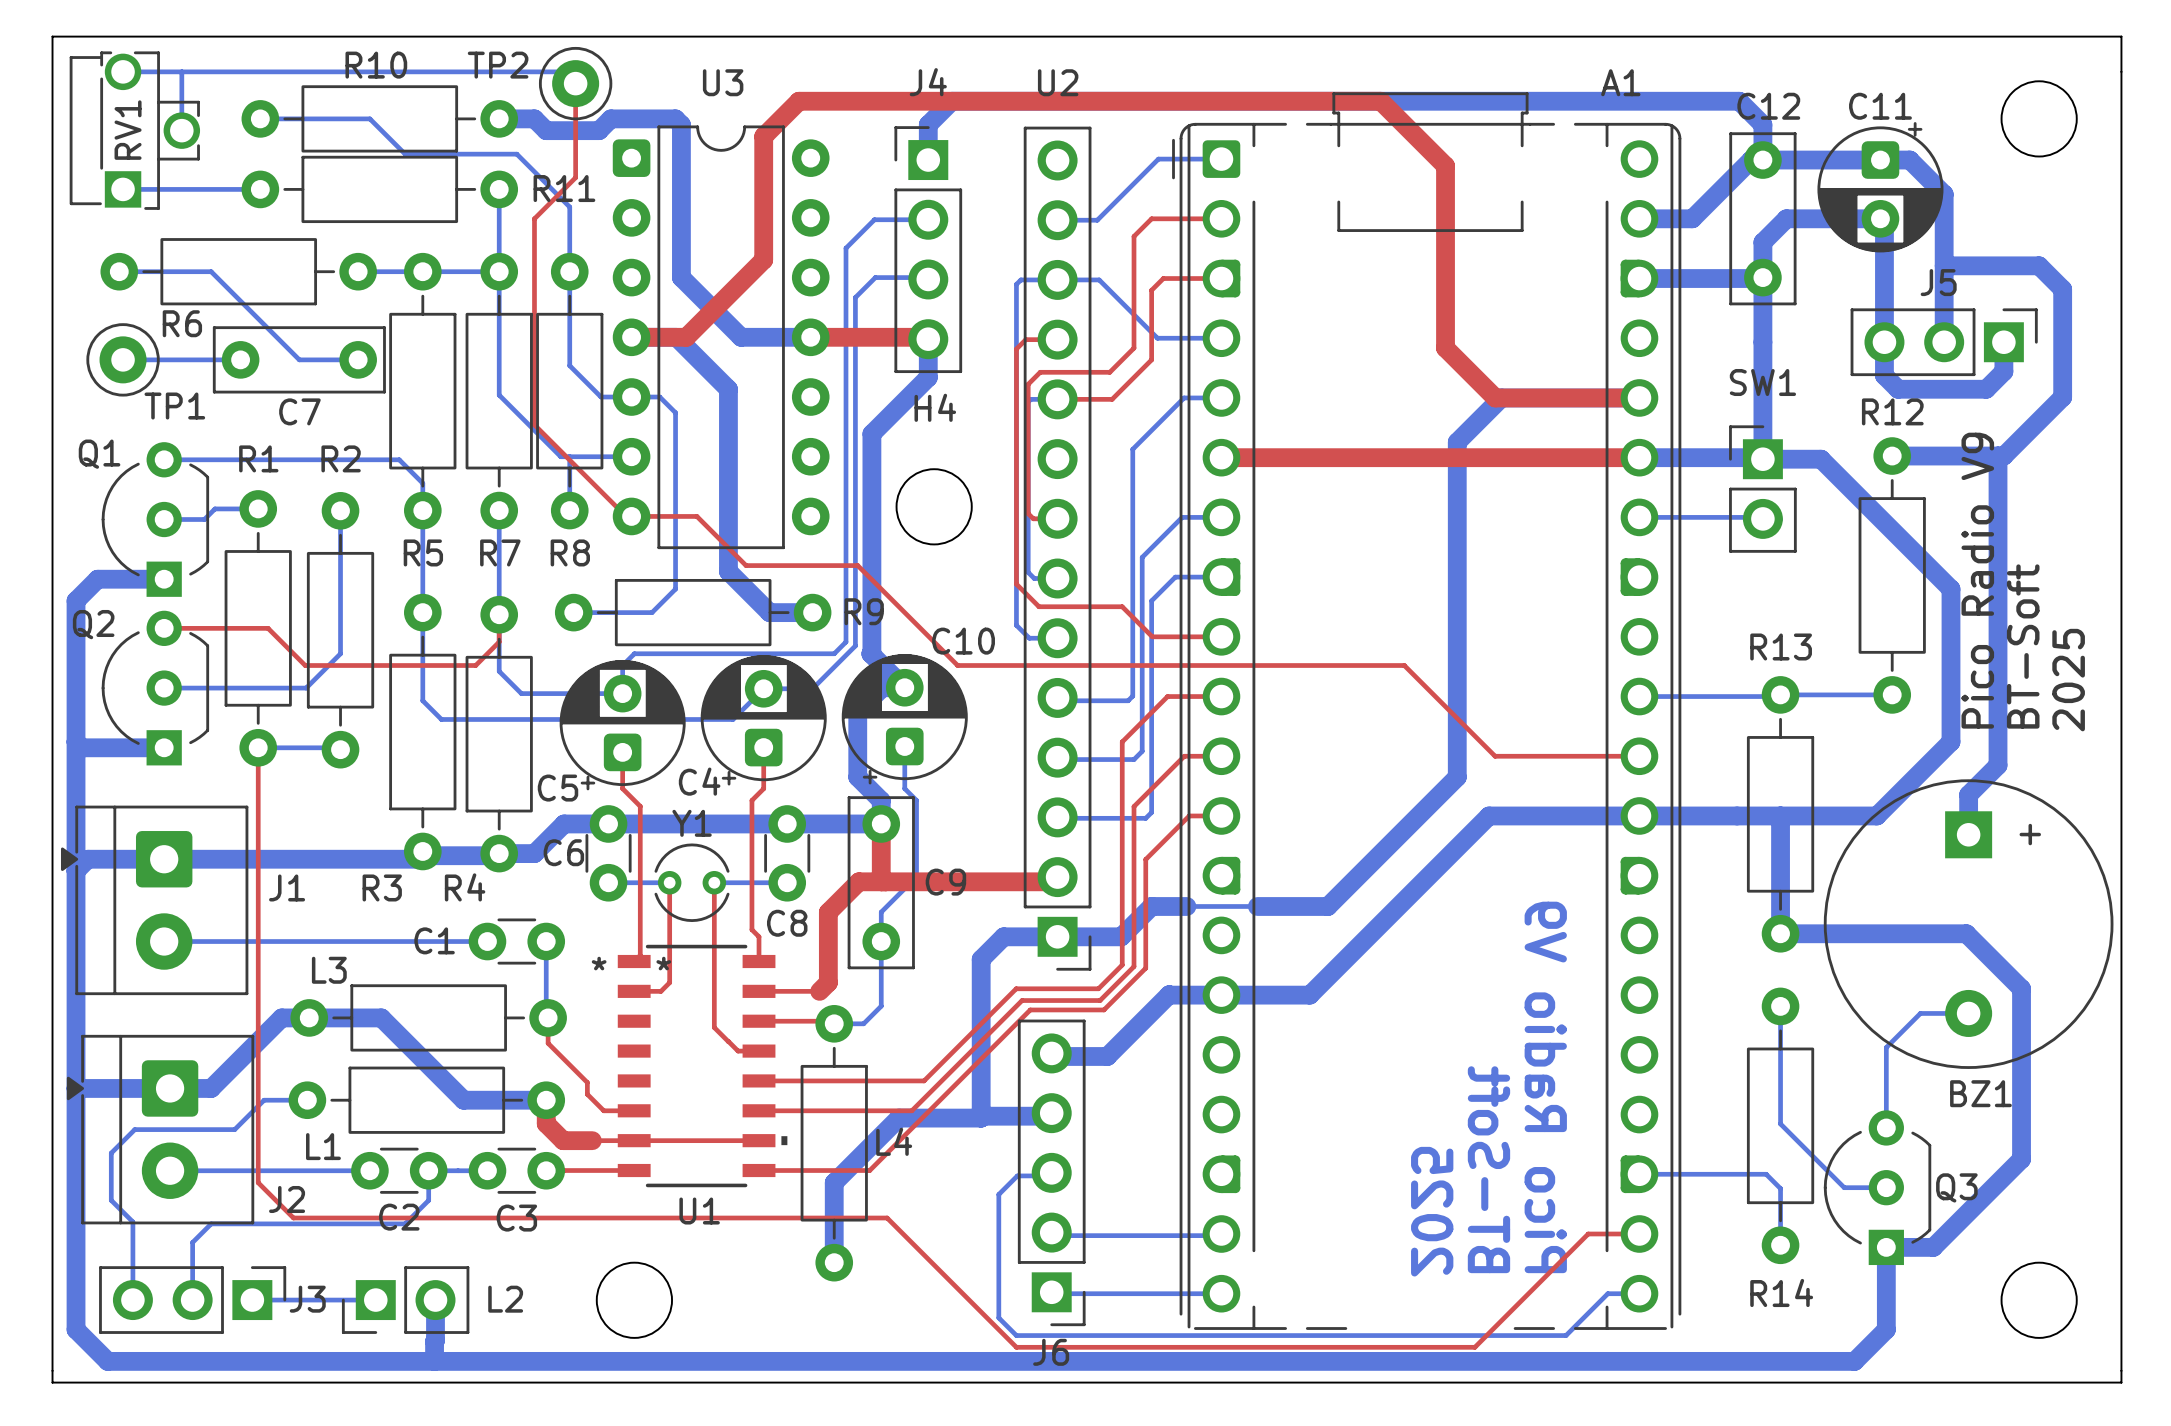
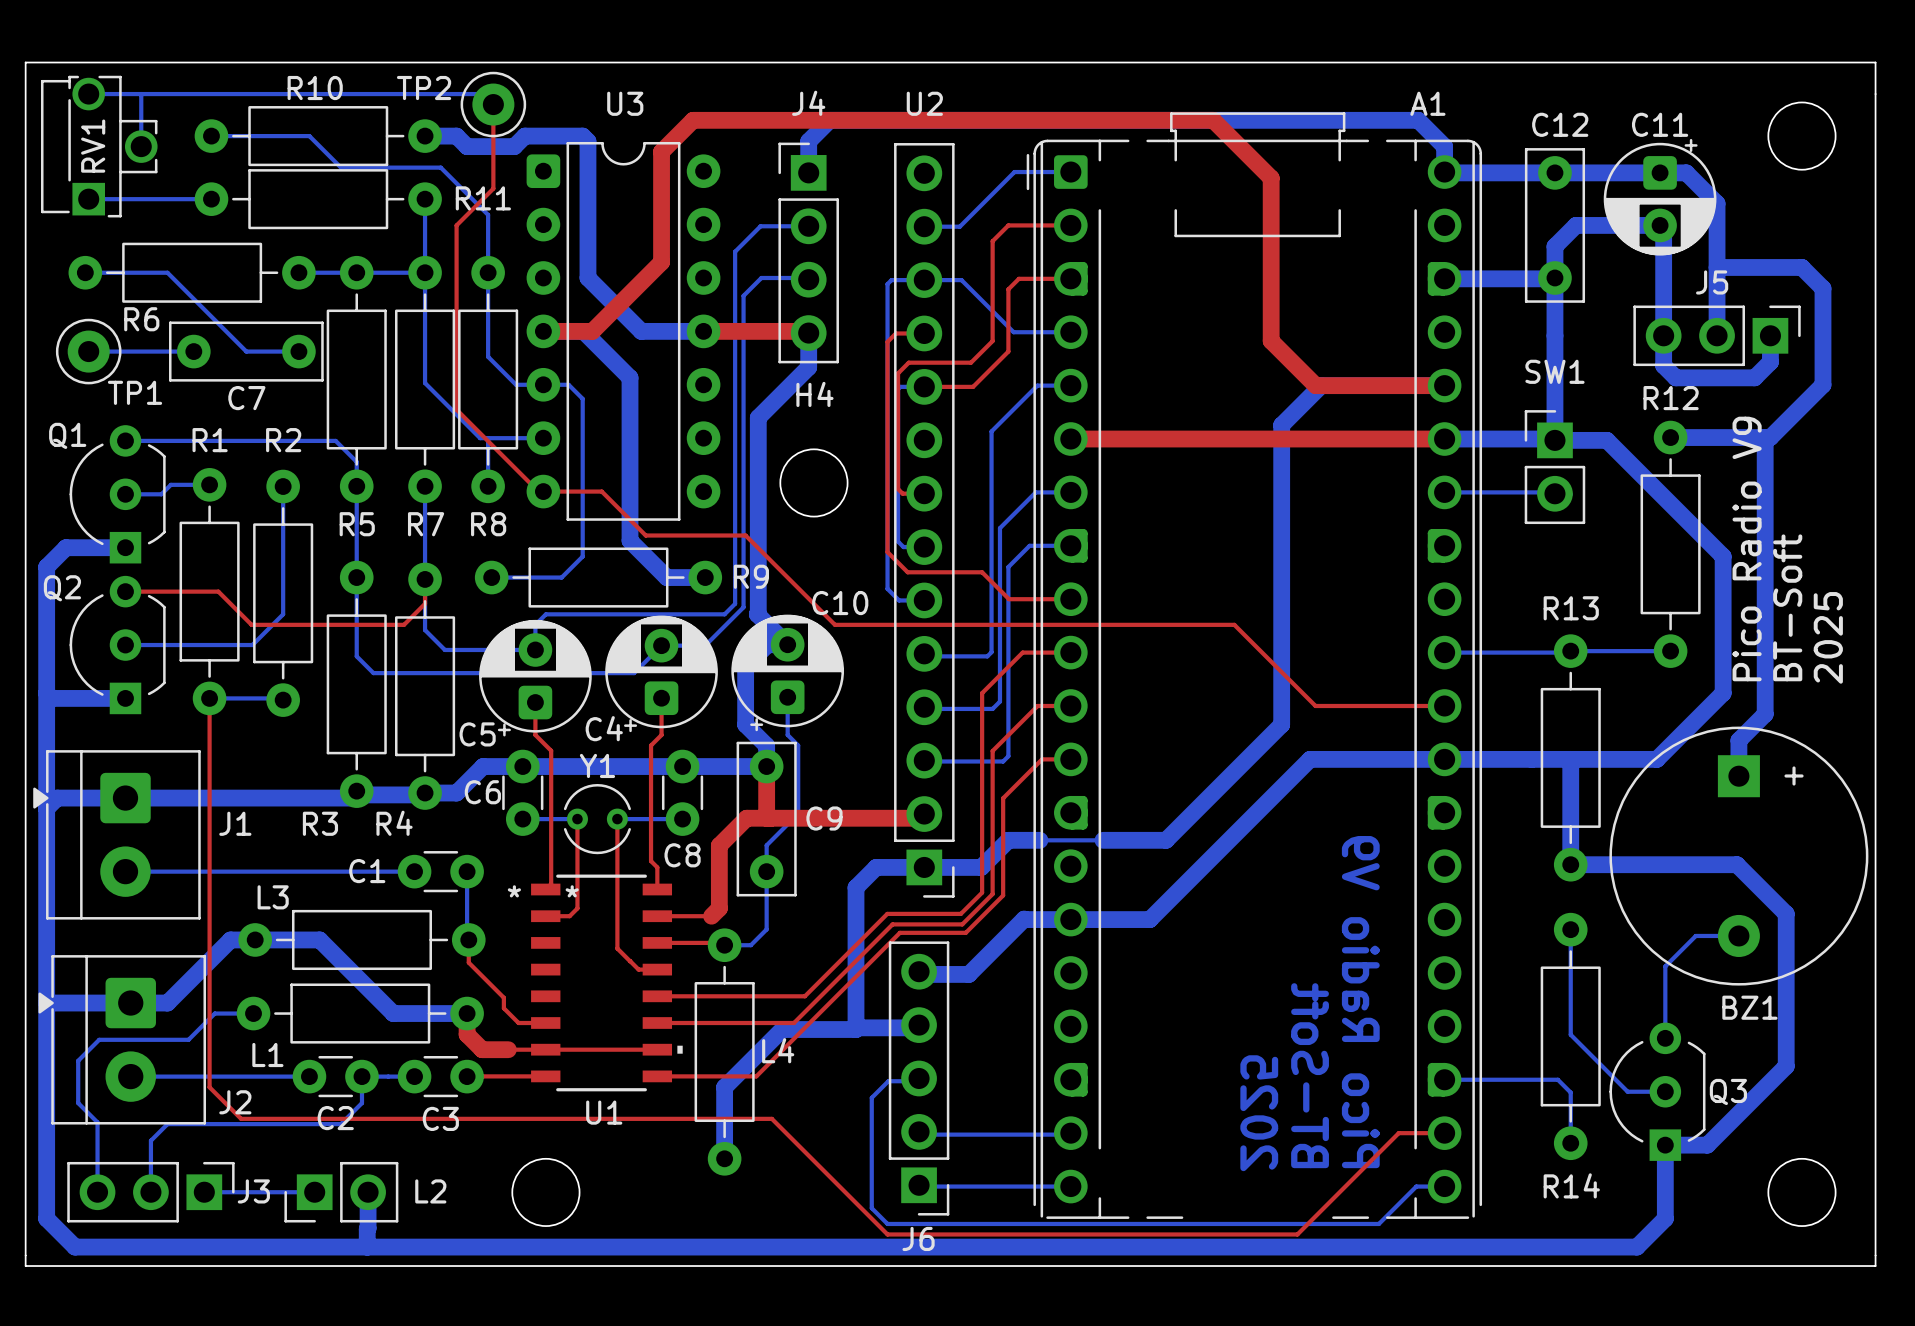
bottom track: (1610, 101) (1739, 101) (1762, 124) (1762, 160) -> (1418, 120) (1444, 146) (1444, 172)
bottom track: (1751, 160) (1692, 218) (1639, 218) -> (1544, 172) (1445, 172)

